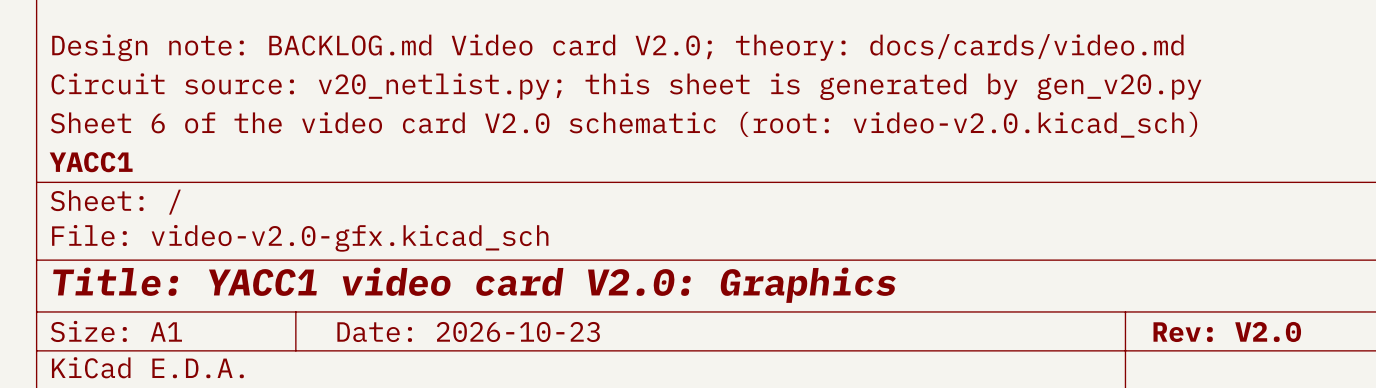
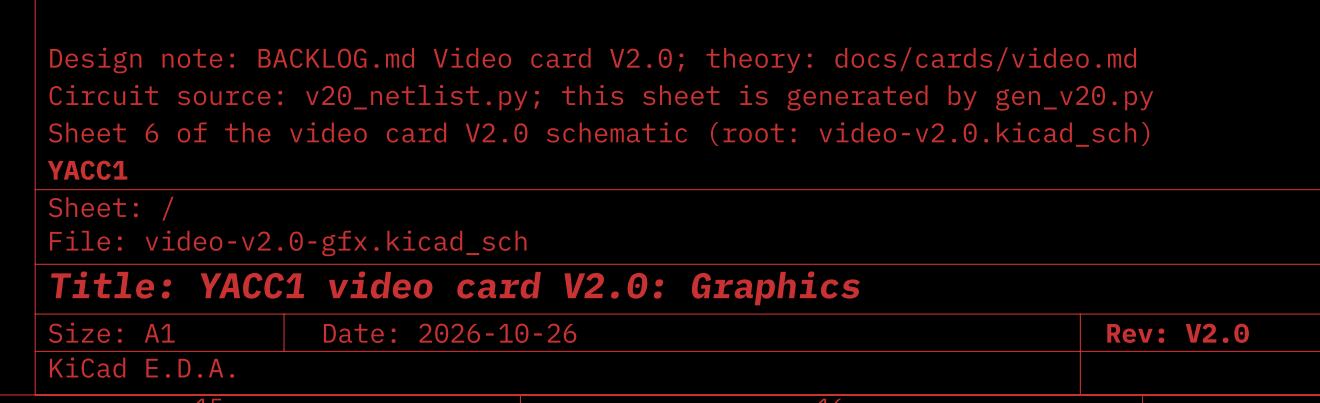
title block: Date: 2026-10-23 (468, 331) -> Date: 2026-10-26 (450, 333)

